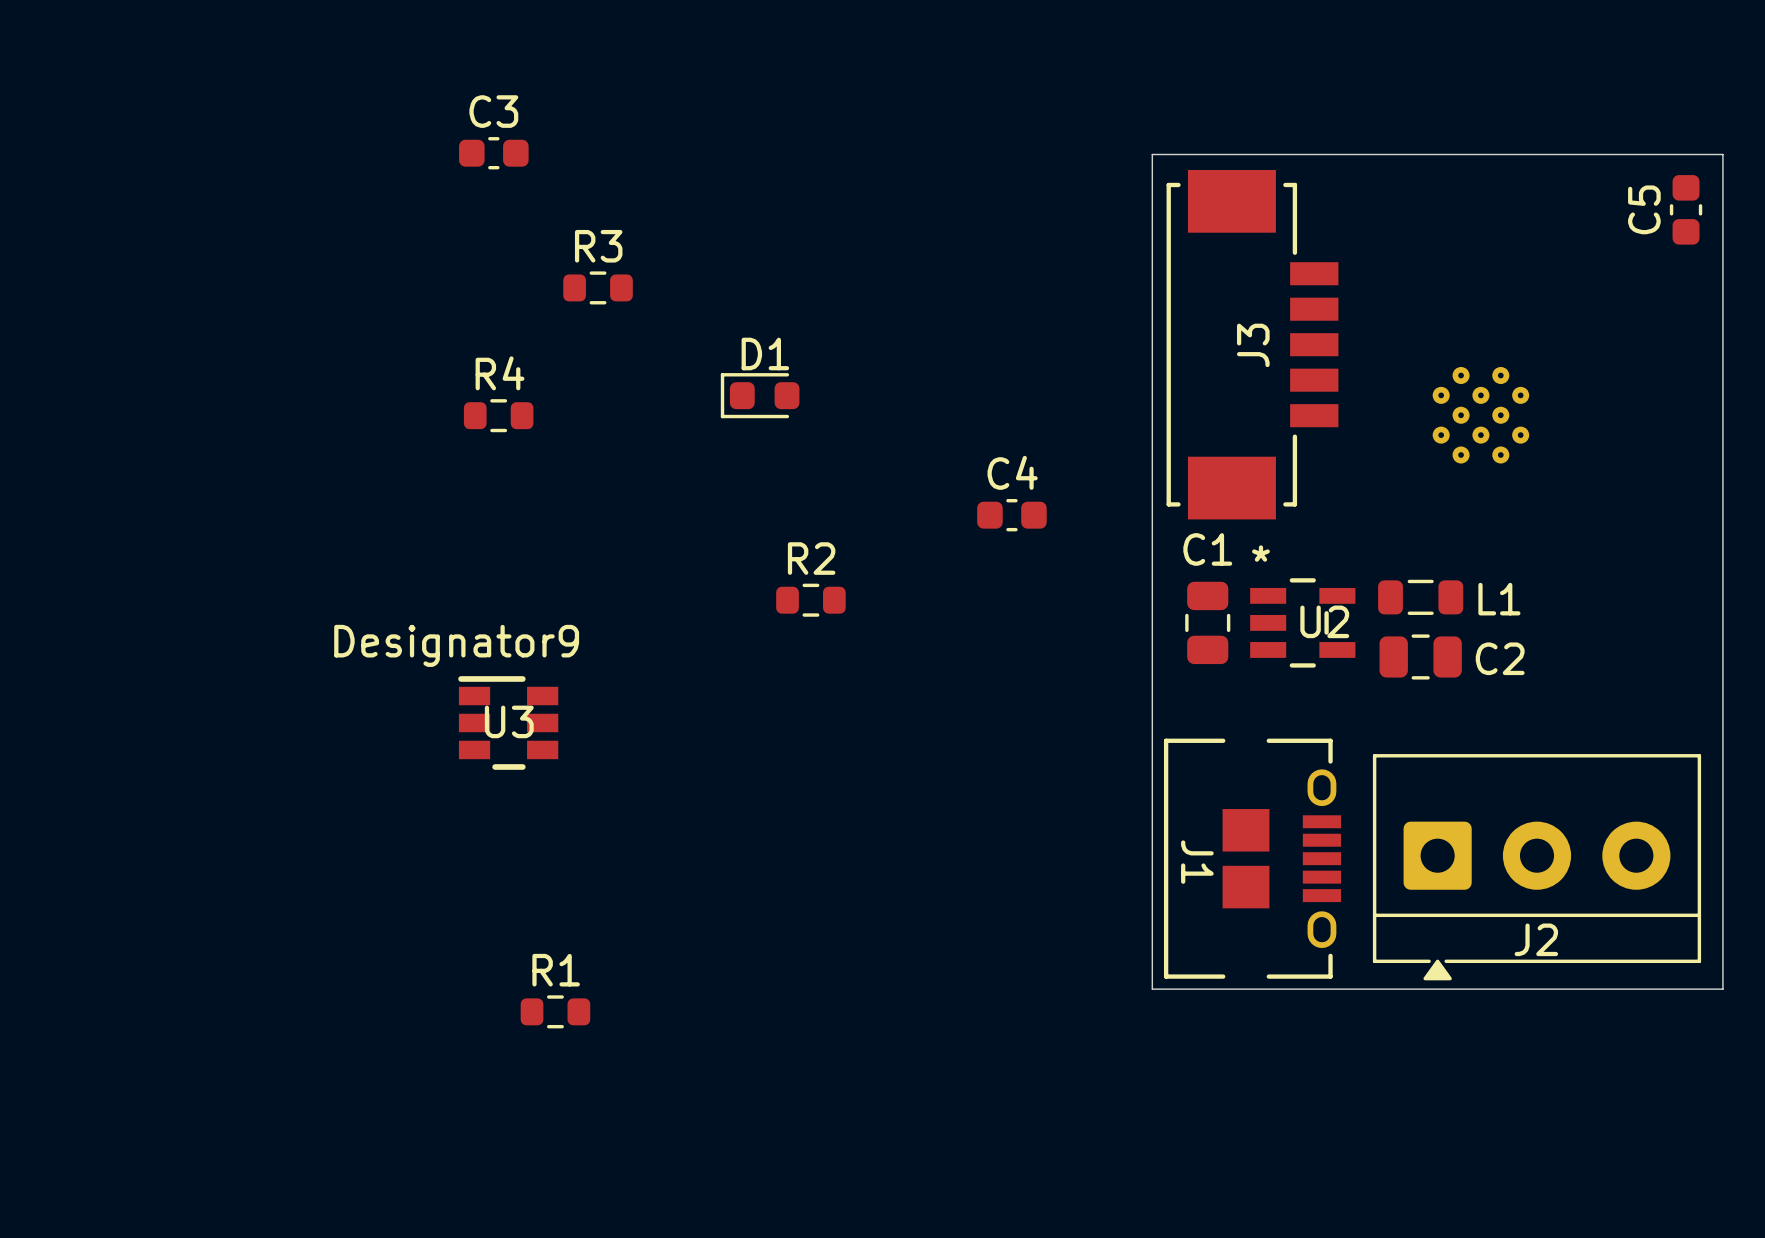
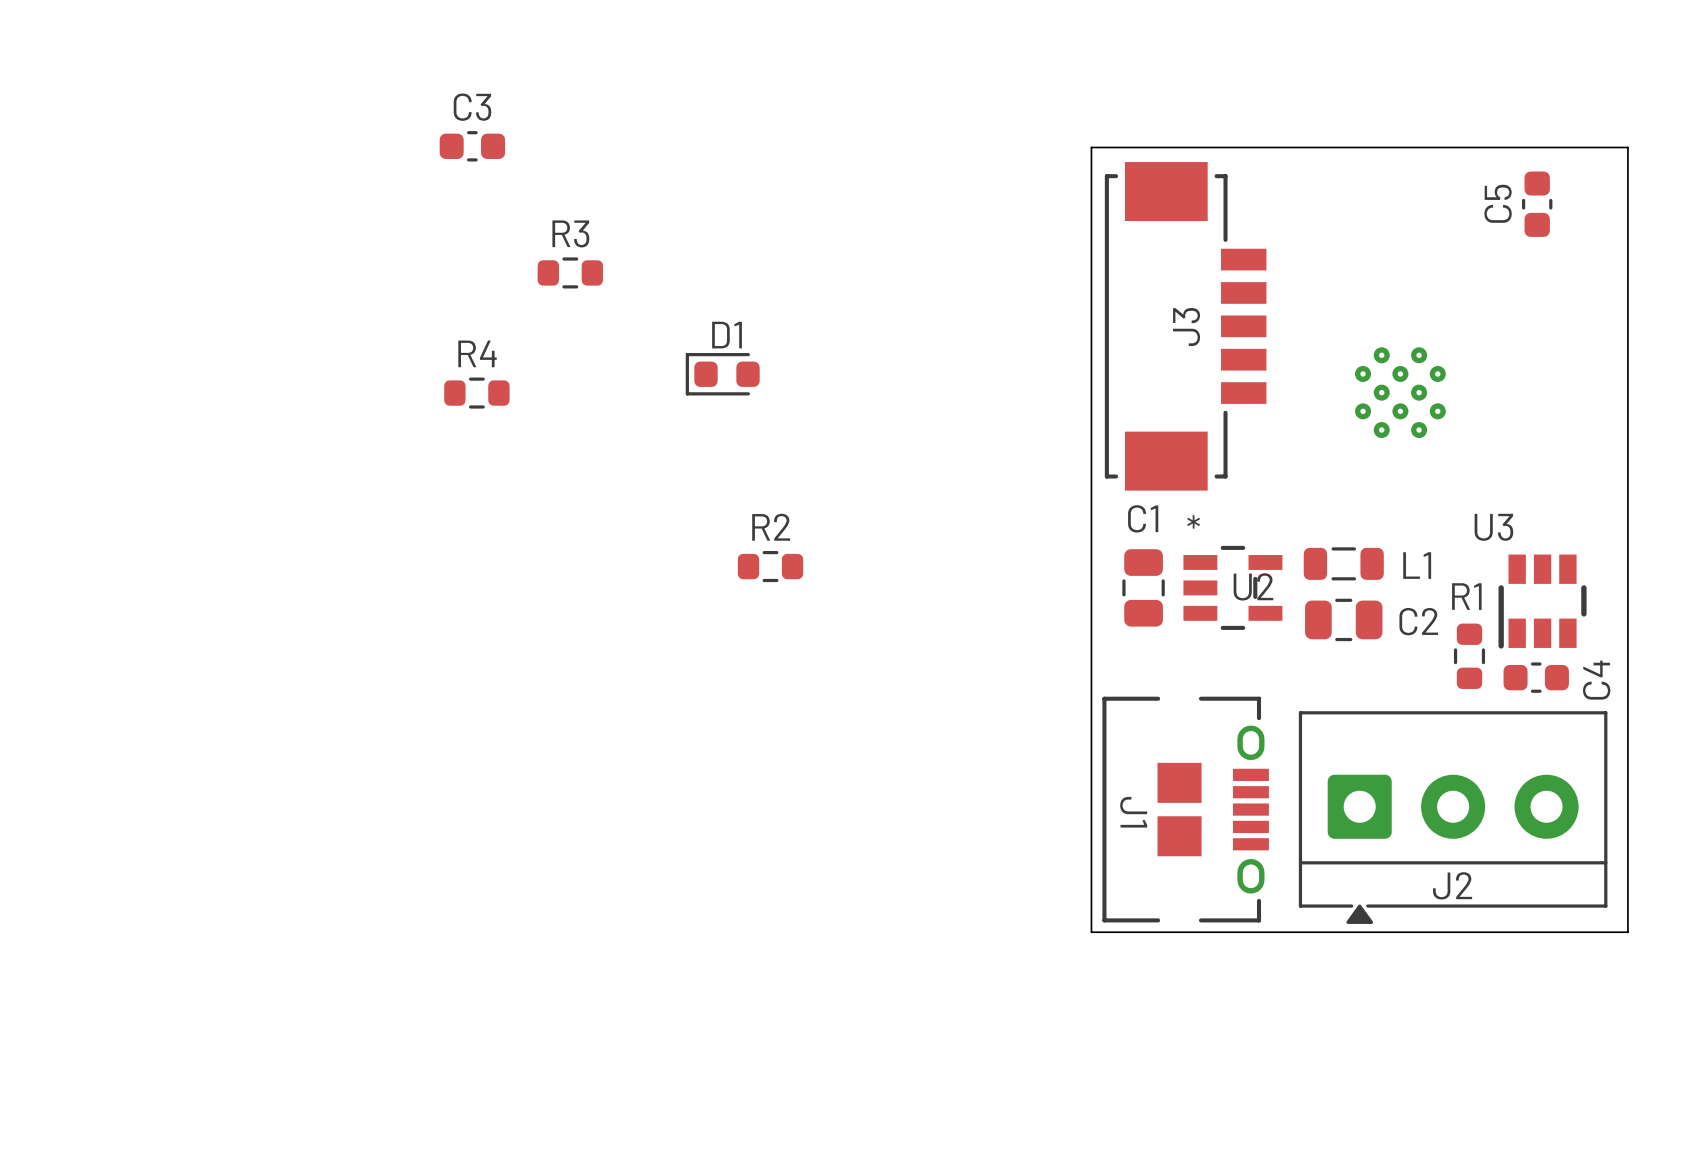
C5 position: (1686, 209) -> (1537, 204)
C4 name rotation: 0° (1012, 472) -> 90° counterclockwise (1596, 680)
C4 name position: C4 (1012, 472) -> C4 (1596, 680)
C4 position: (1011, 515) -> (1536, 677)
U3 footprint: [458, 676, 559, 770] -> [1498, 554, 1587, 649]
U3 name position: U3 (509, 721) -> U3 (1493, 527)
R1 rotation: 0° (555, 1011) -> 90° clockwise (1469, 656)
R1 position: (555, 1011) -> (1469, 656)

